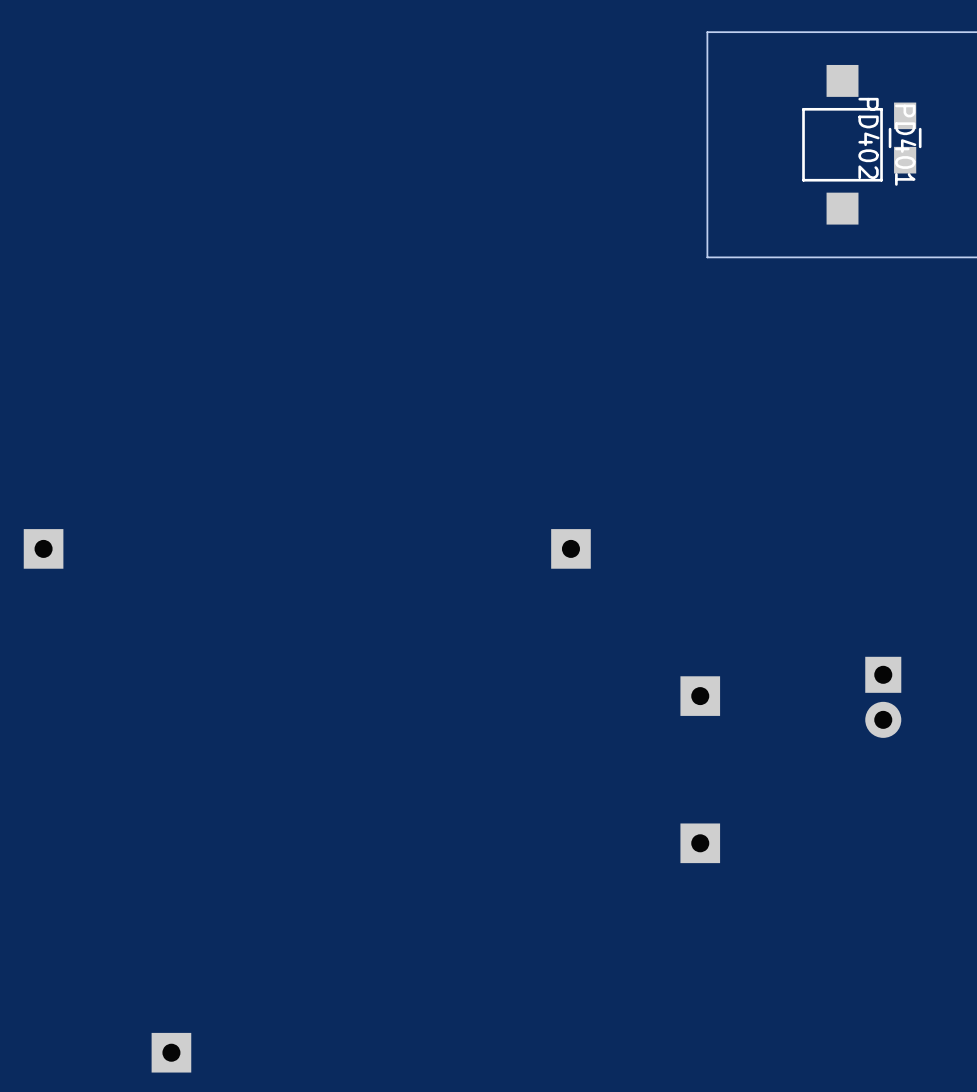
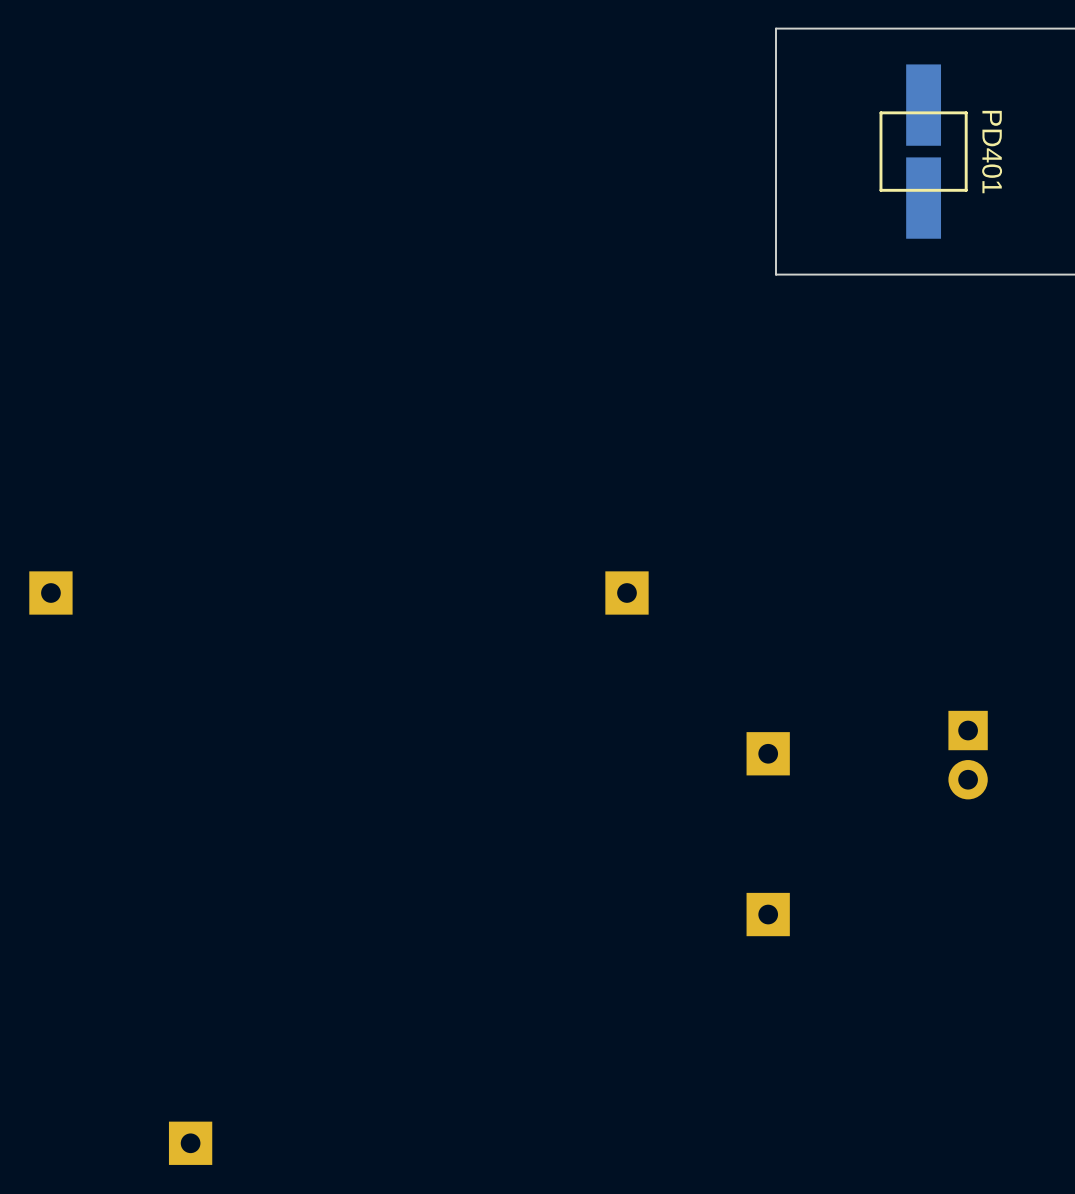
PD401 footprint: [802, 64, 883, 225] -> [879, 64, 968, 239]
PD402: (905, 138) -> none

